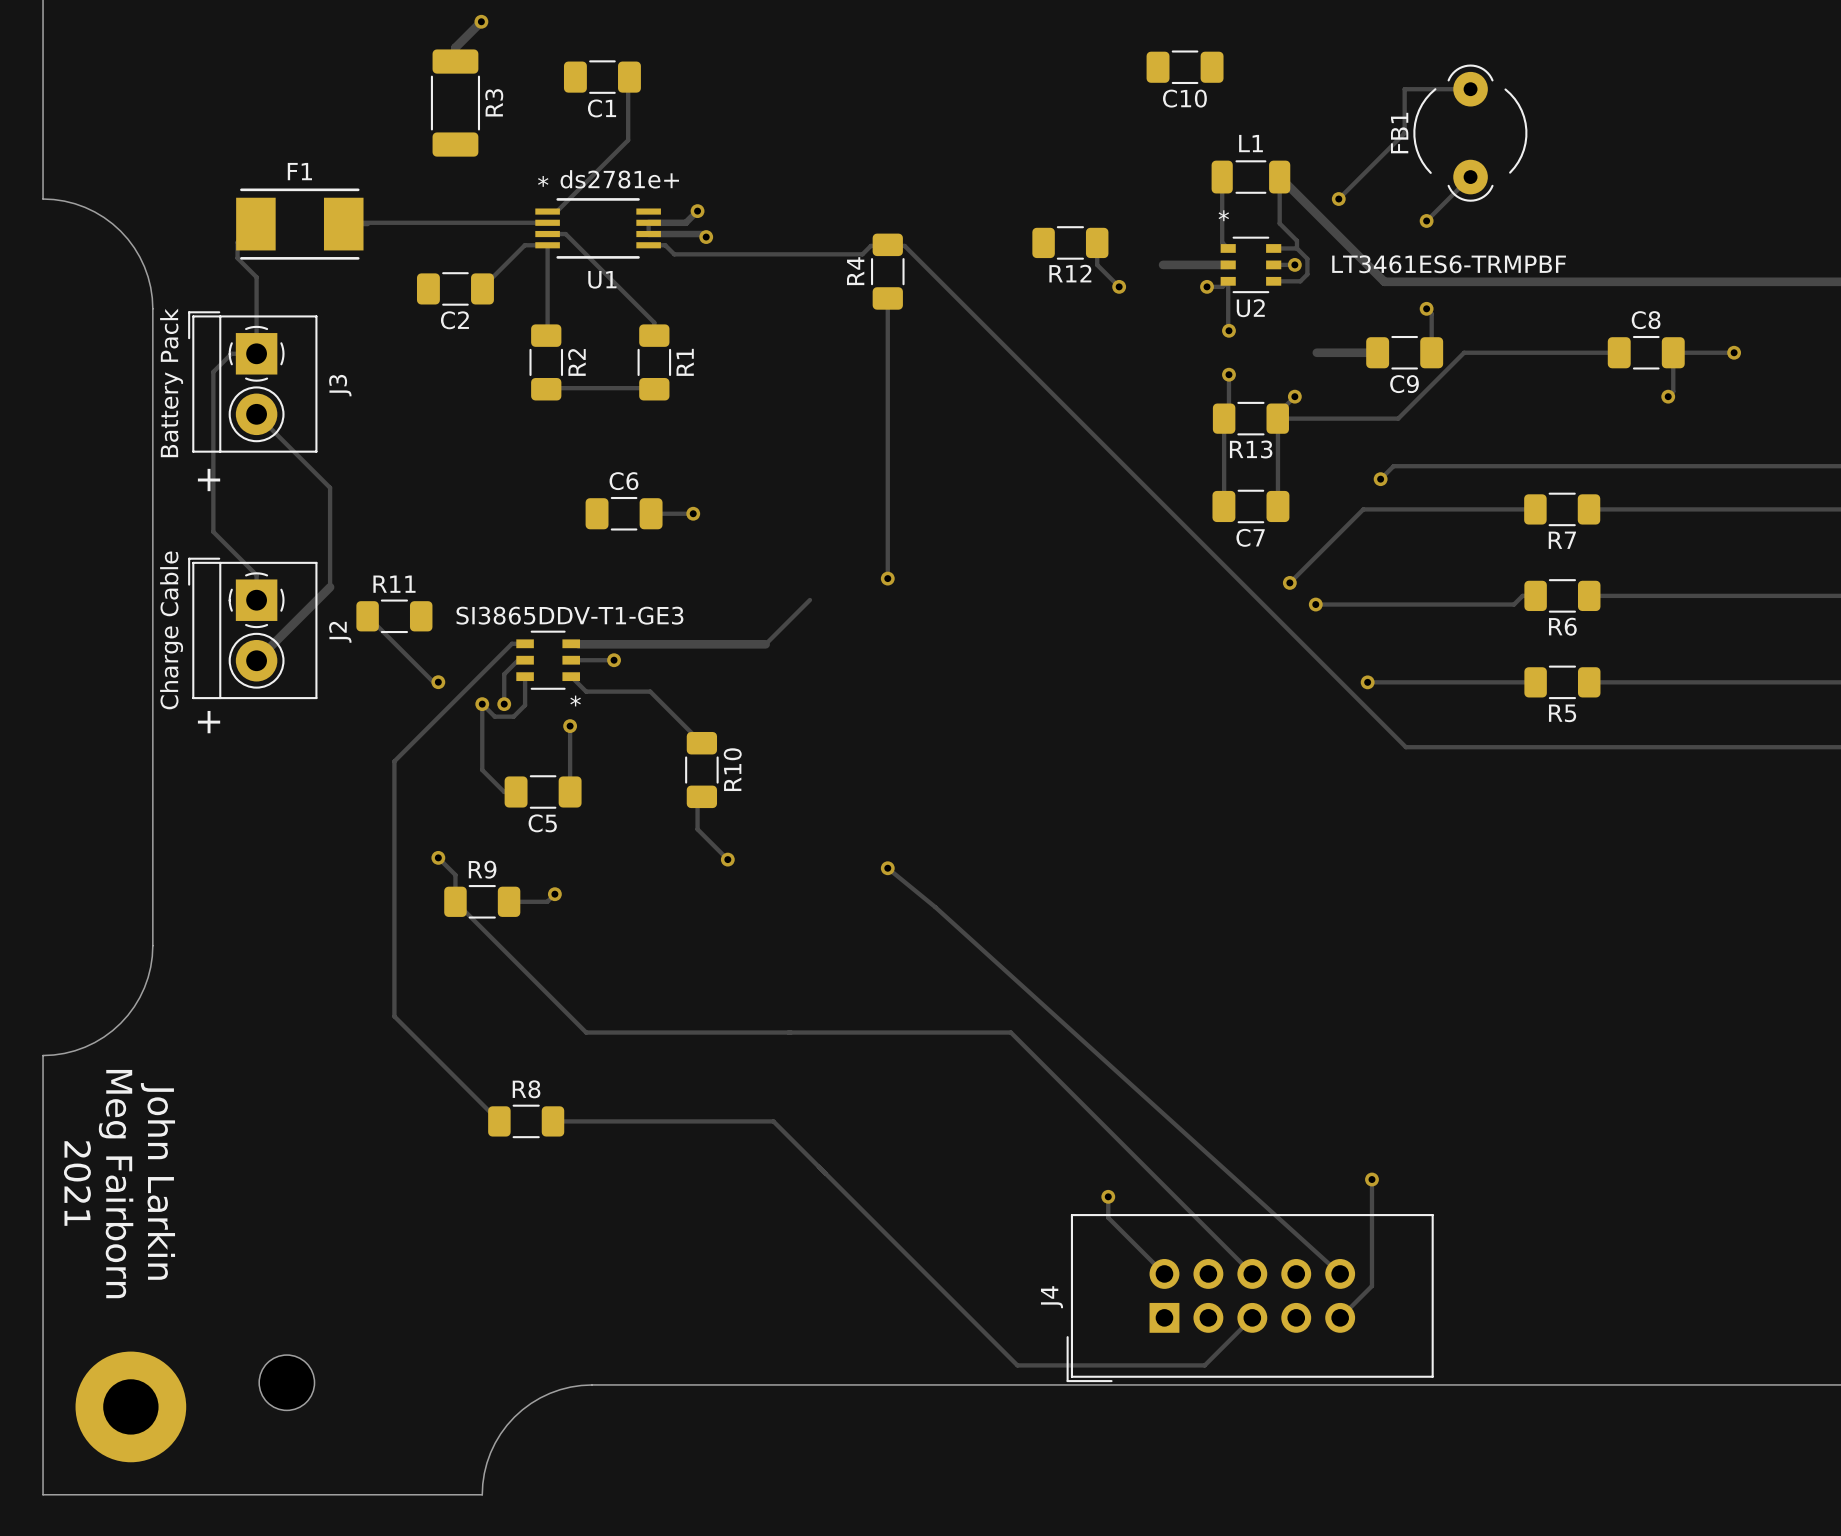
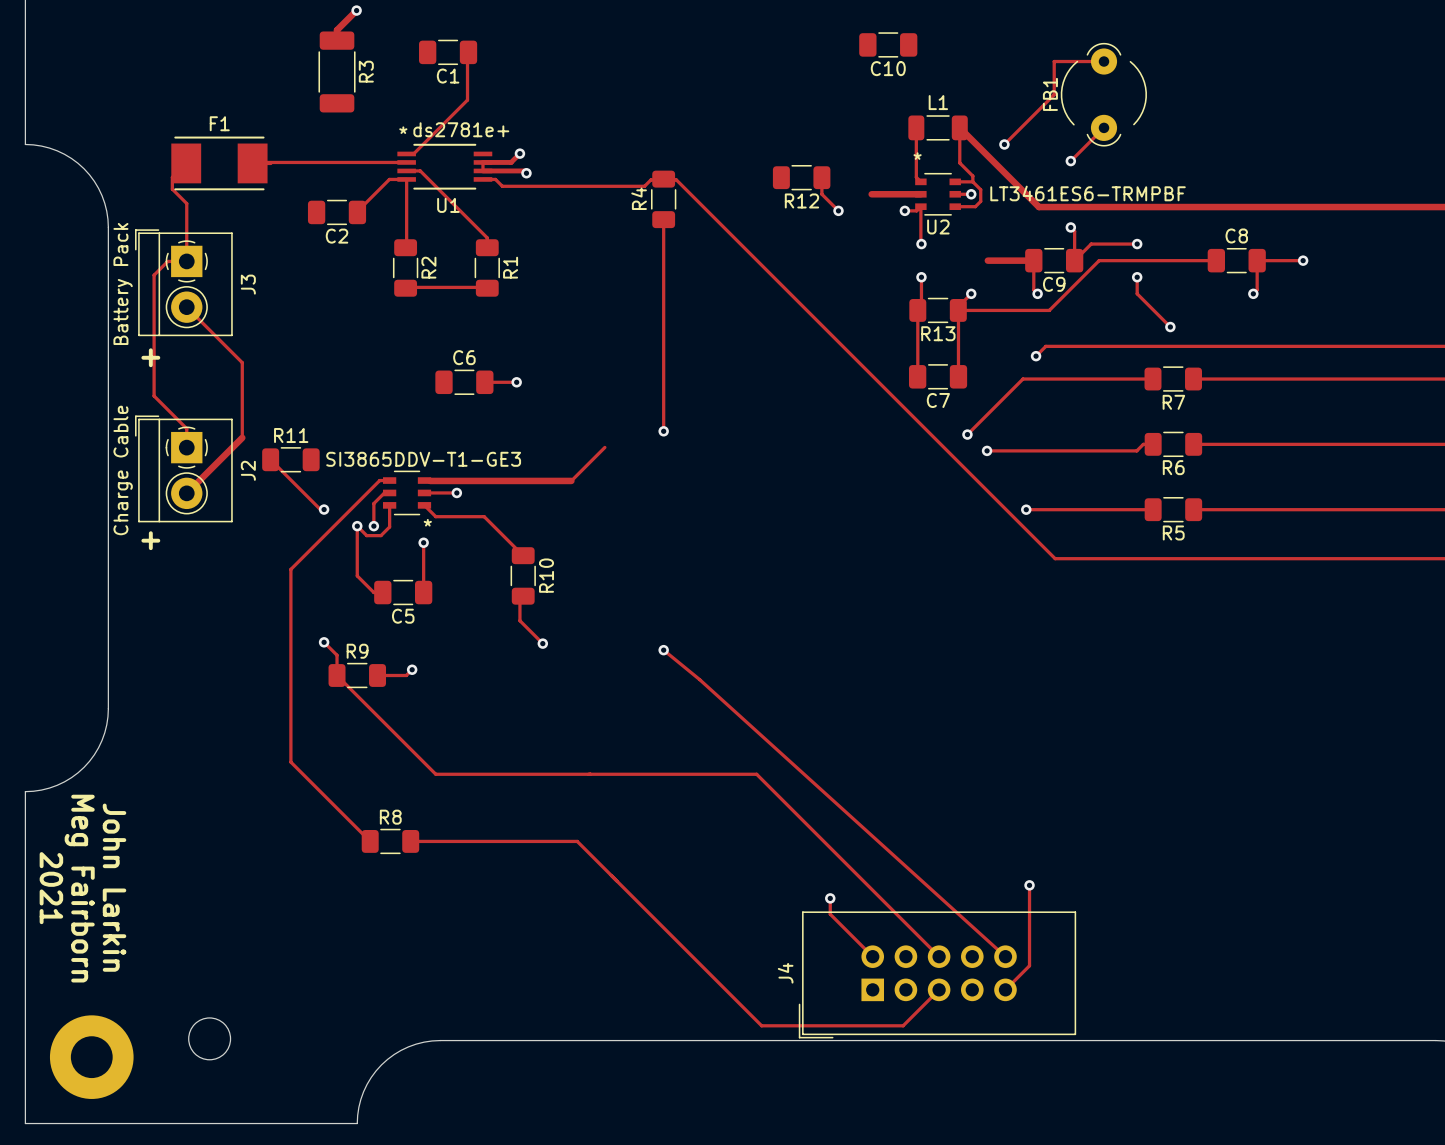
track: none -> (1137, 244) (1091, 244) (1074, 260)
via: none -> (1137, 244)
track: none -> (1033, 260) (1033, 290) (1037, 293)
track: none -> (1137, 277) (1137, 293) (1170, 327)
via: none -> (1137, 277)
via: none -> (1037, 293)
via: none -> (1170, 327)

